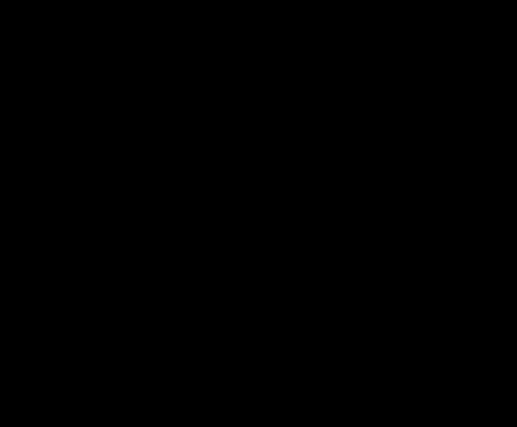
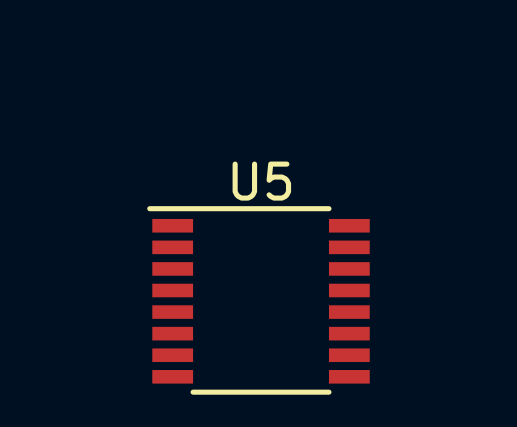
U5: none -> (258, 300)

